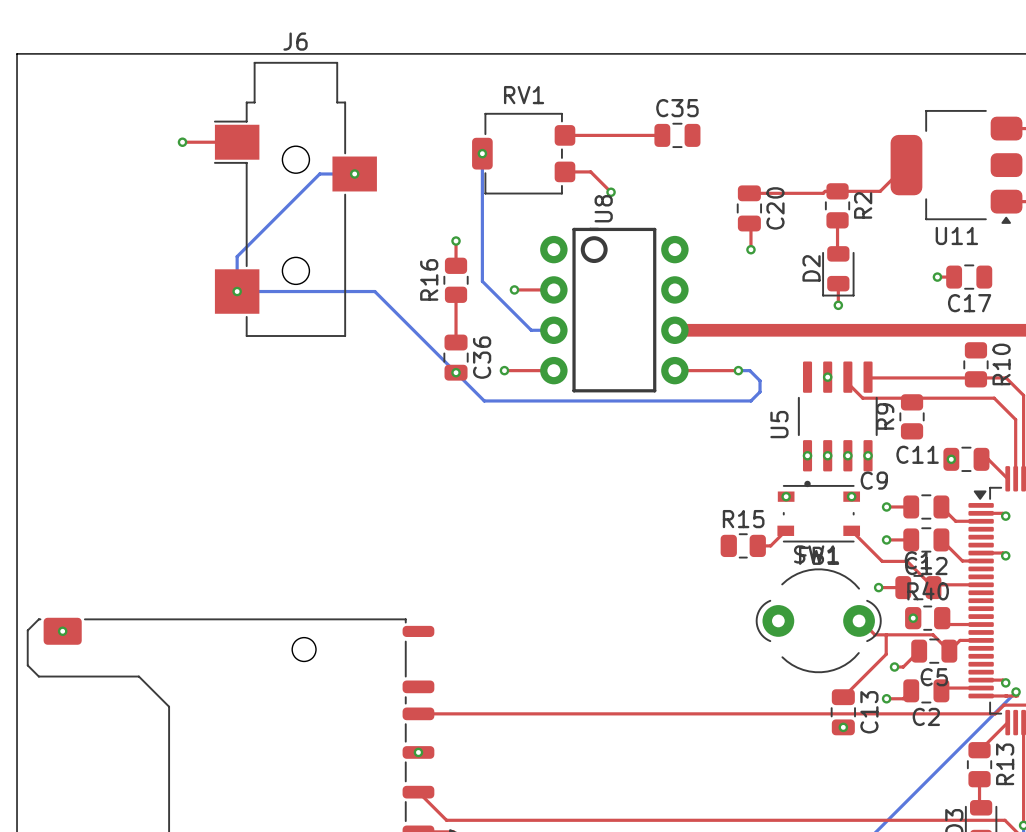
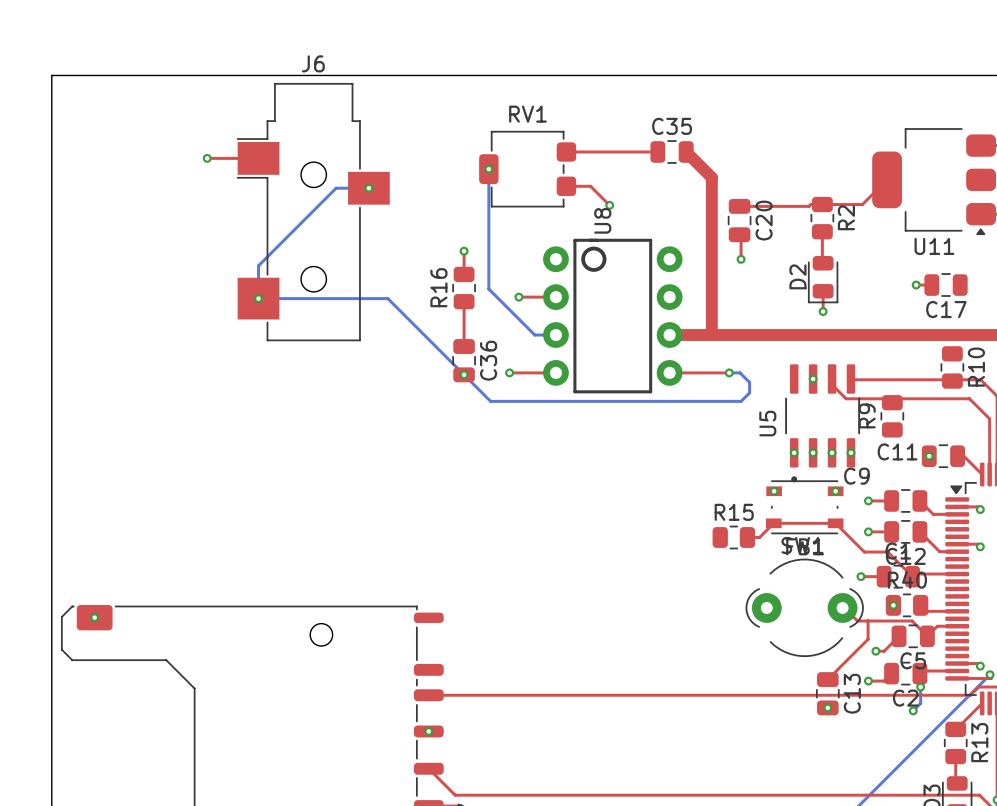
top track: none -> (686, 151) (711, 177) (711, 335)
top track: none -> (773, 523) (835, 523)
bottom track: none -> (920, 687) (920, 703) (913, 710)
via: none -> (920, 687)
via: none -> (913, 710)

